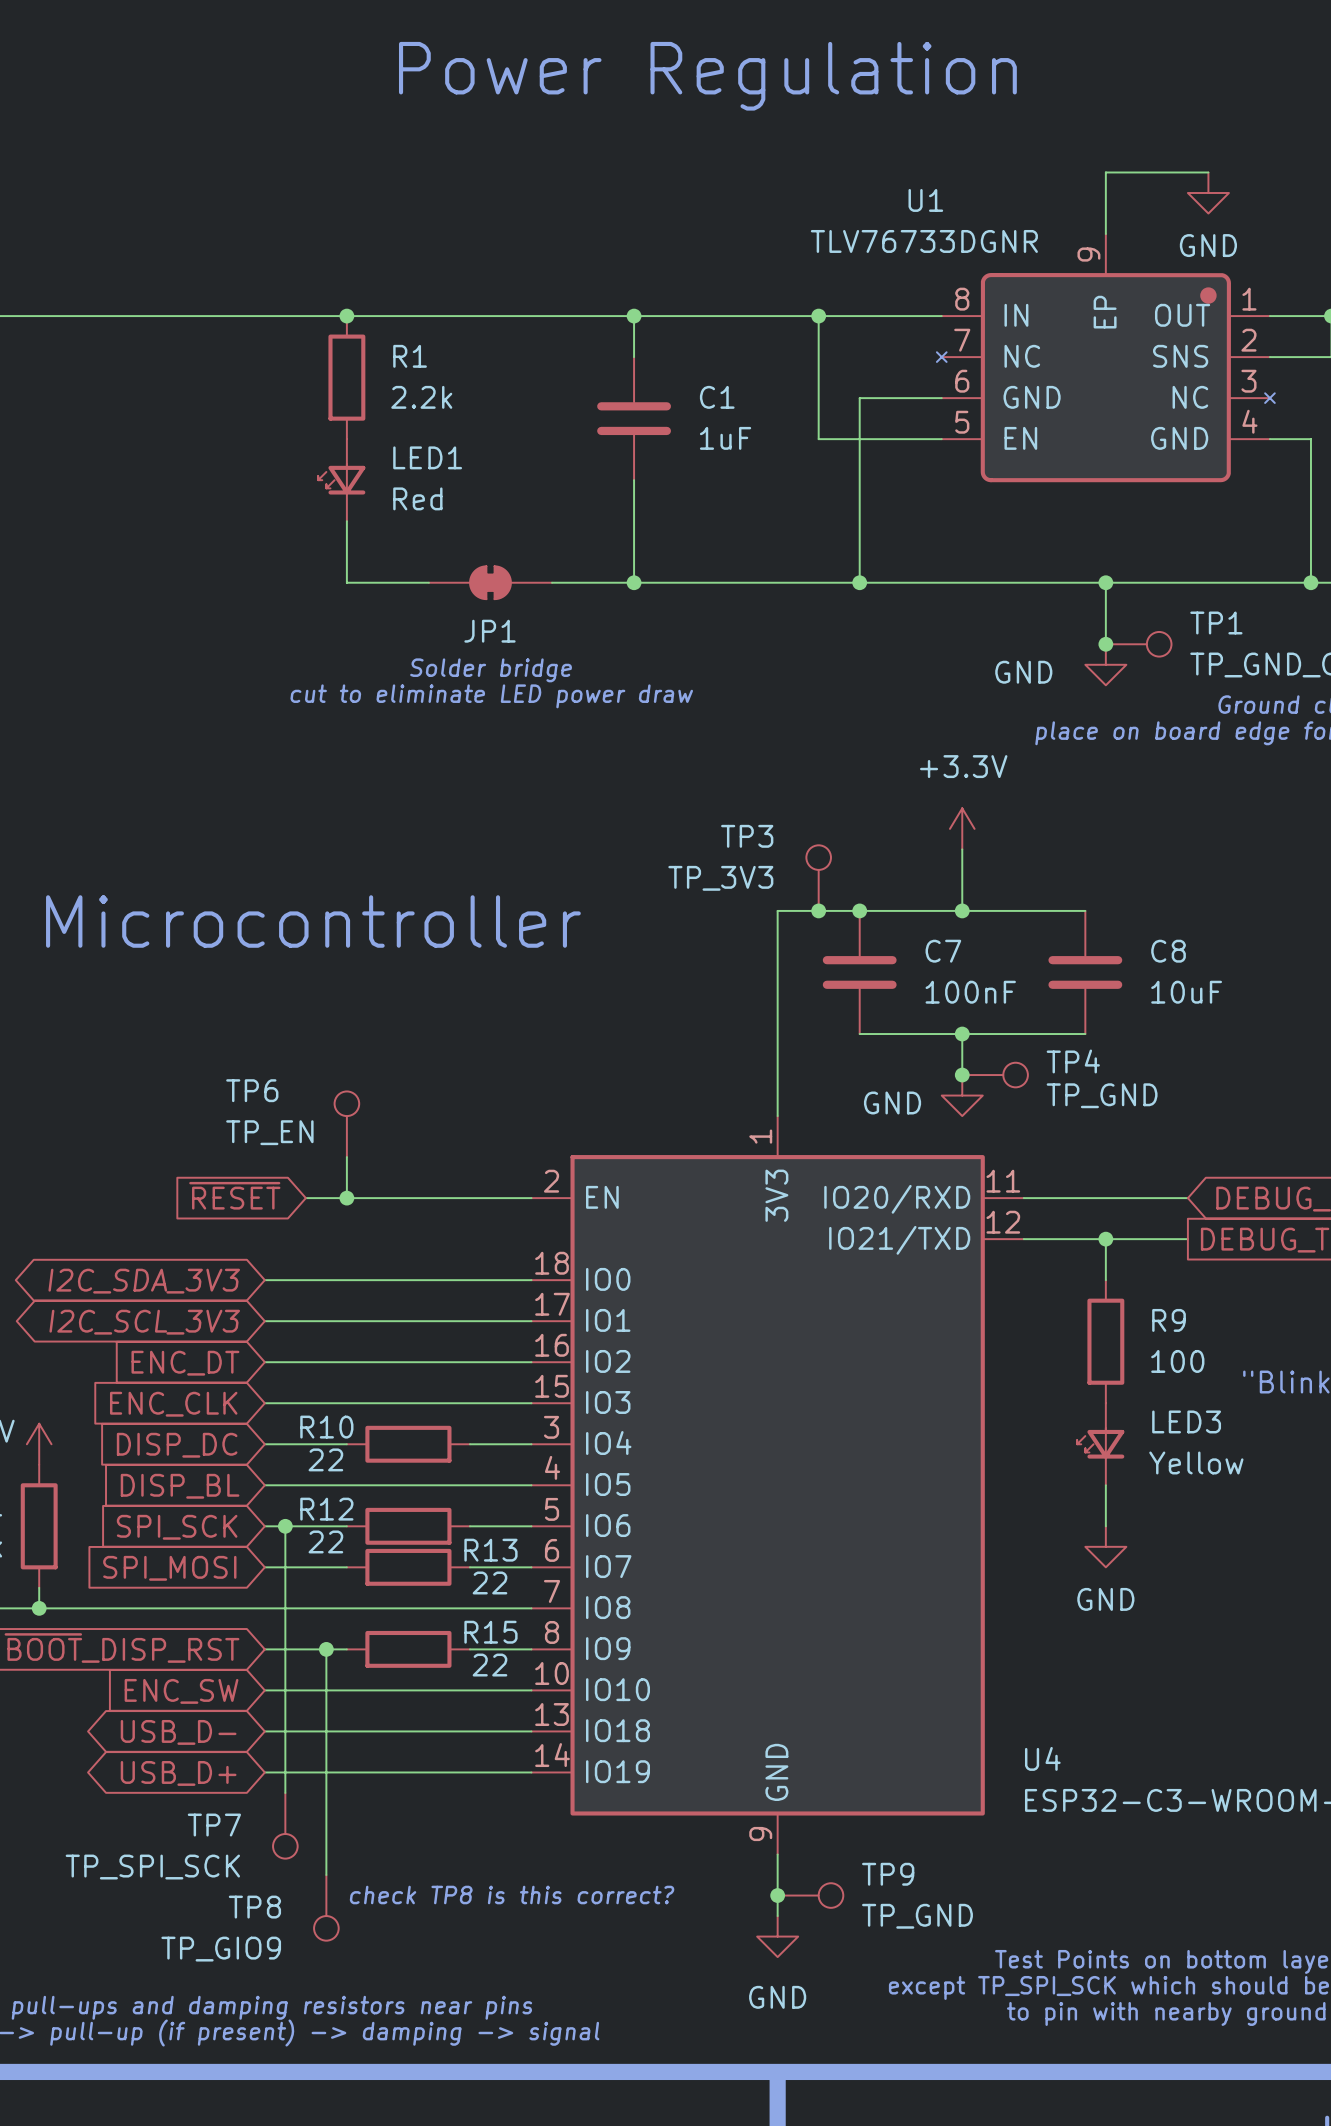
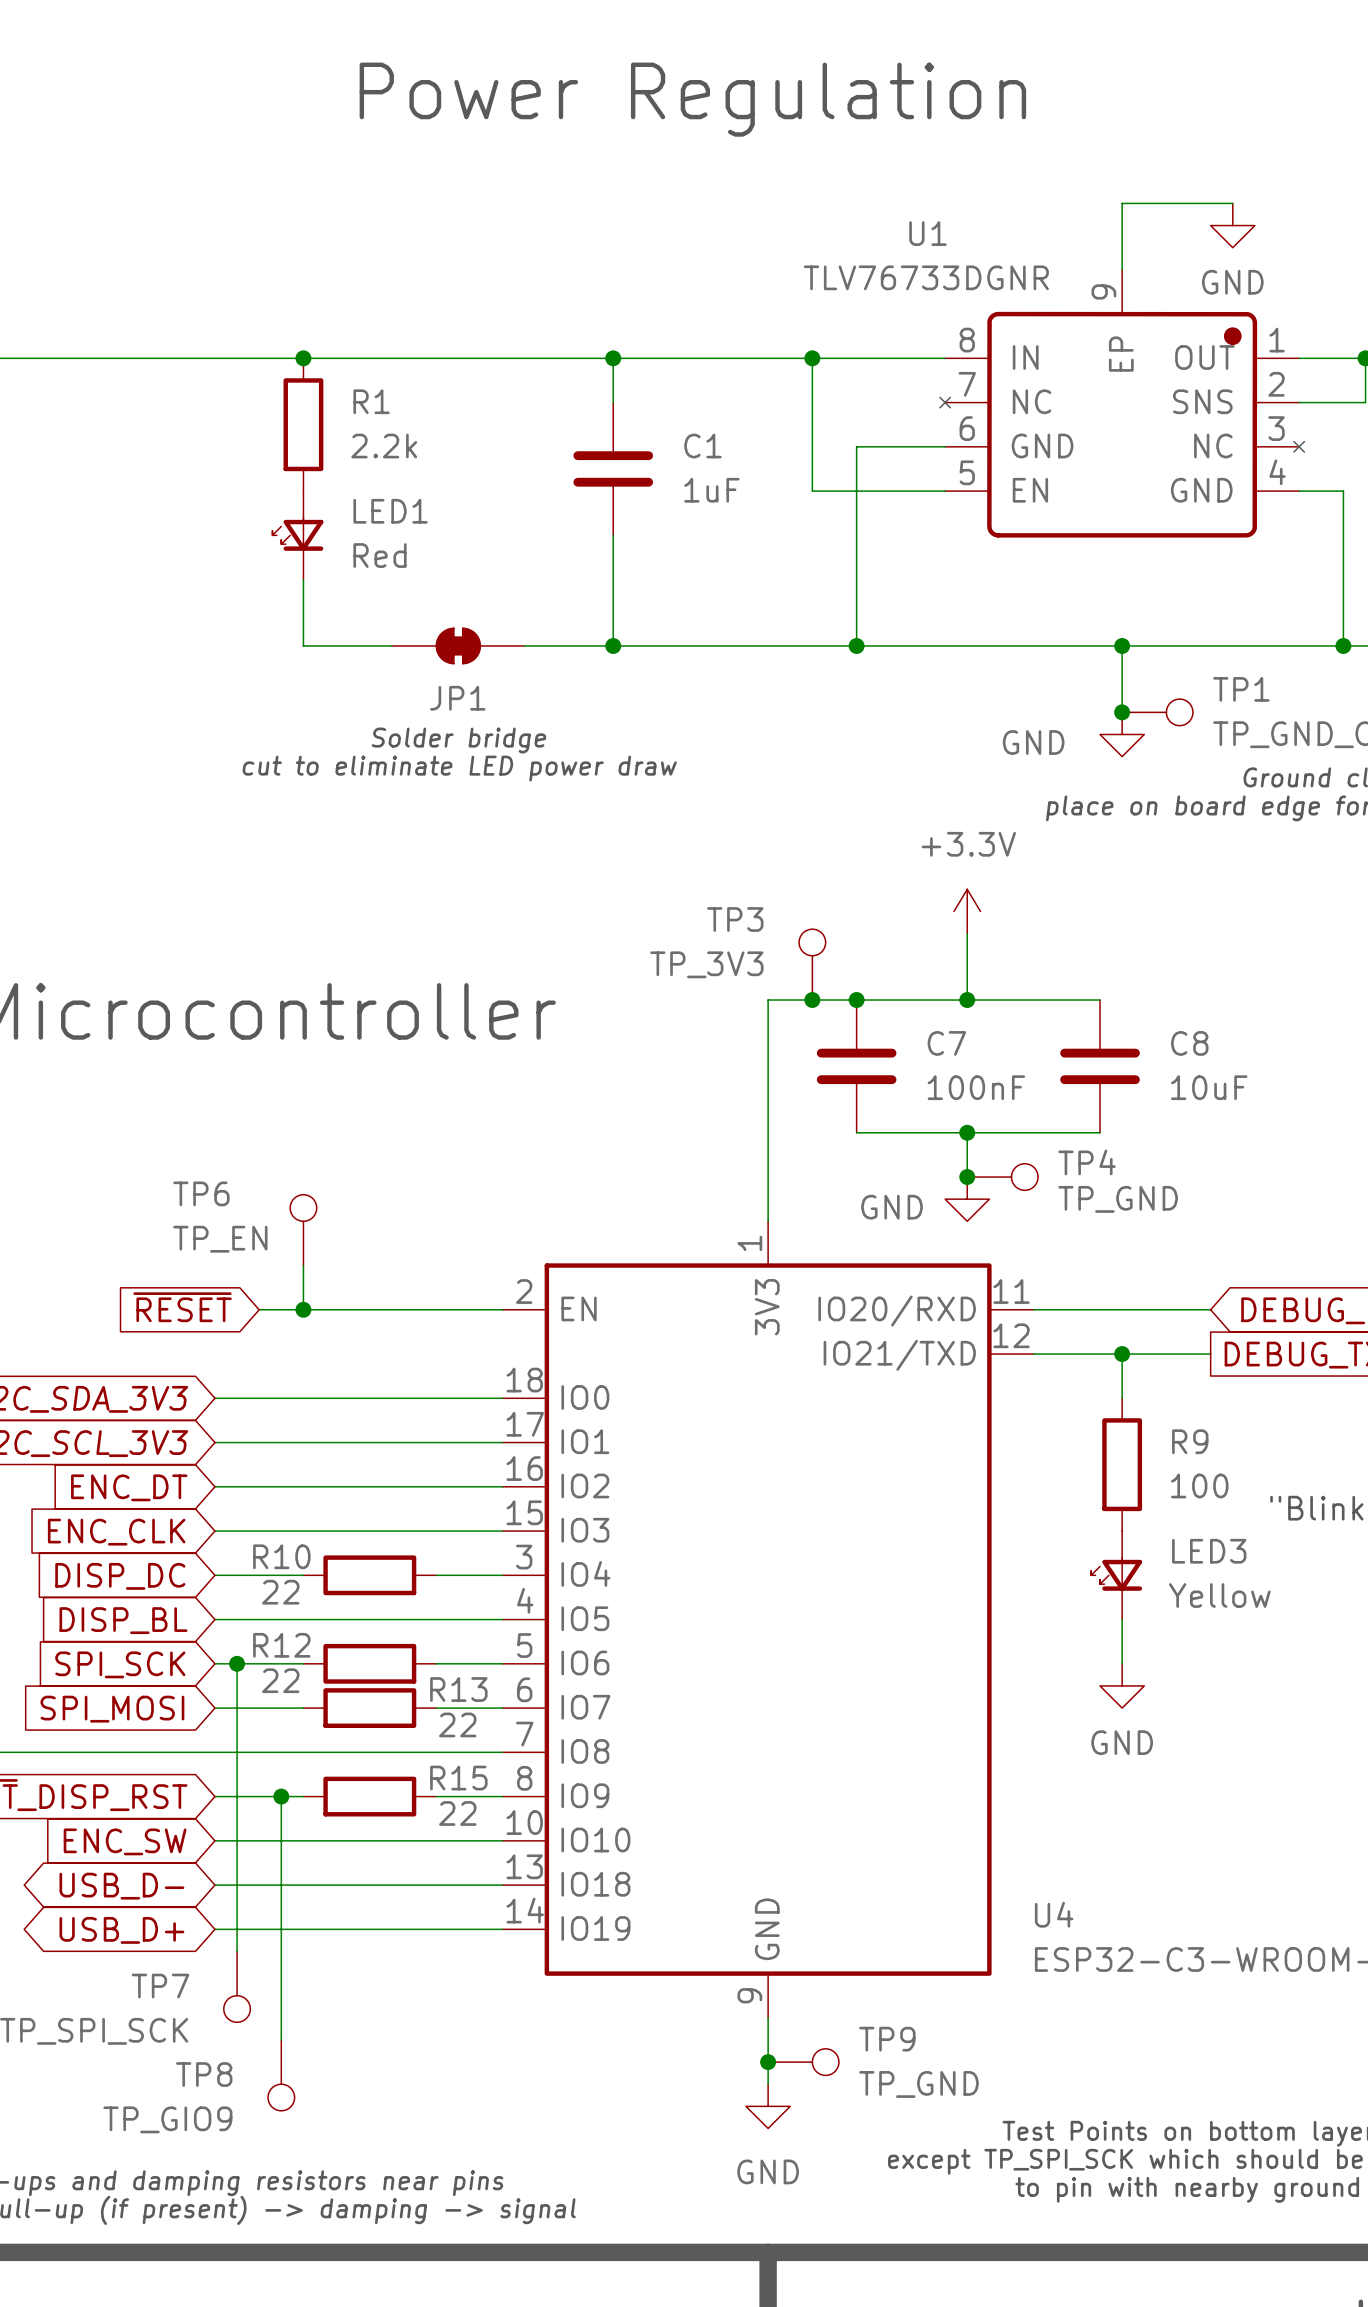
text: check TP8 is this correct? (512, 1895) -> none

